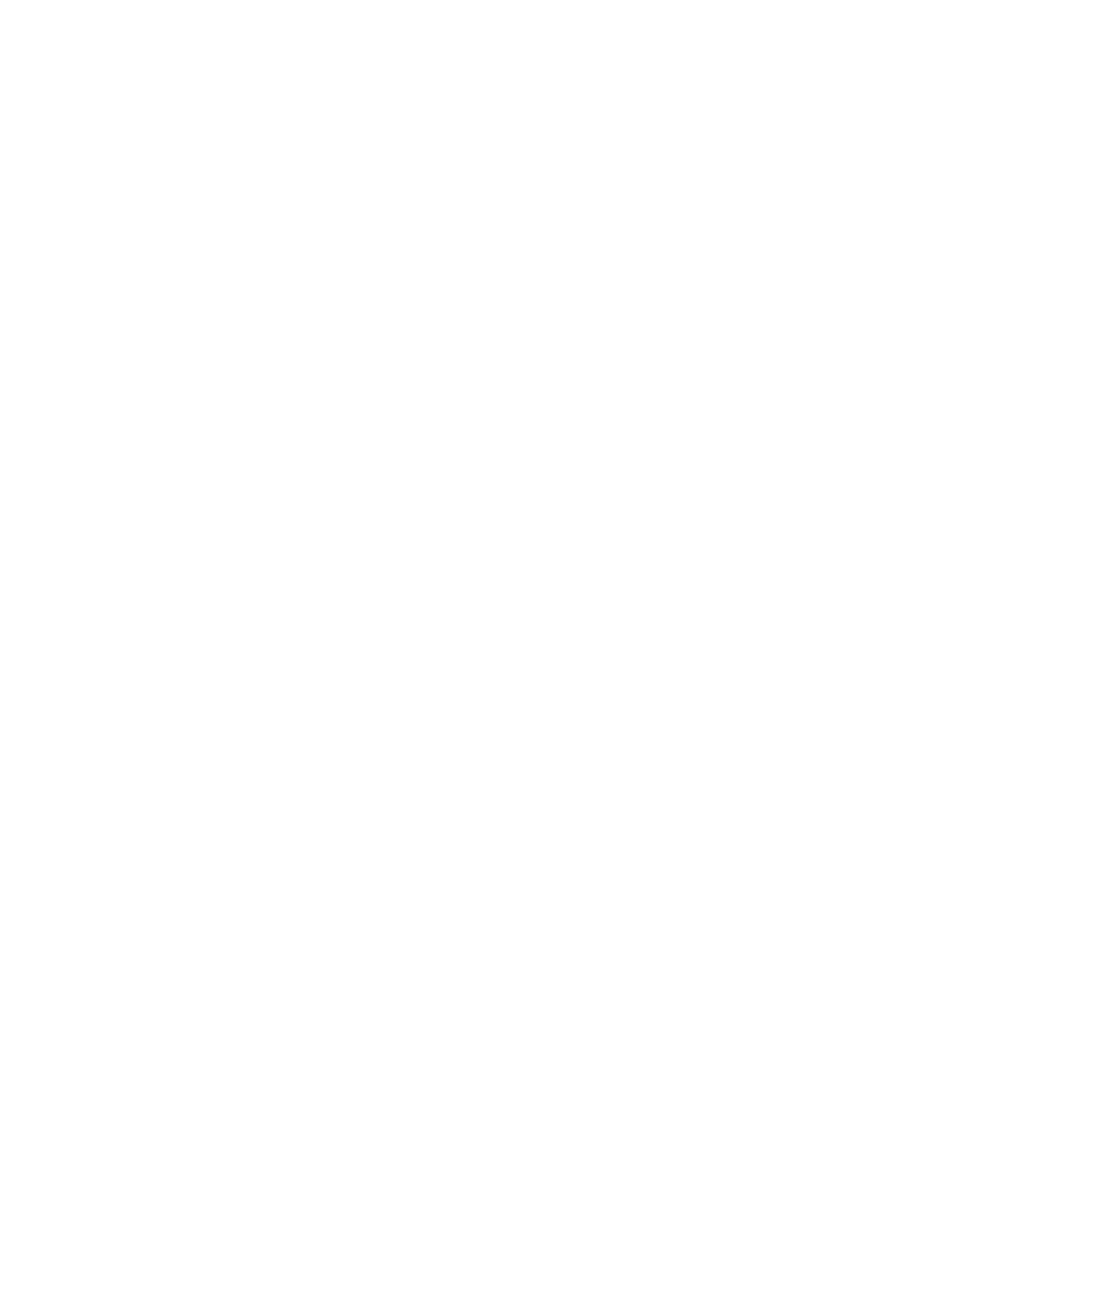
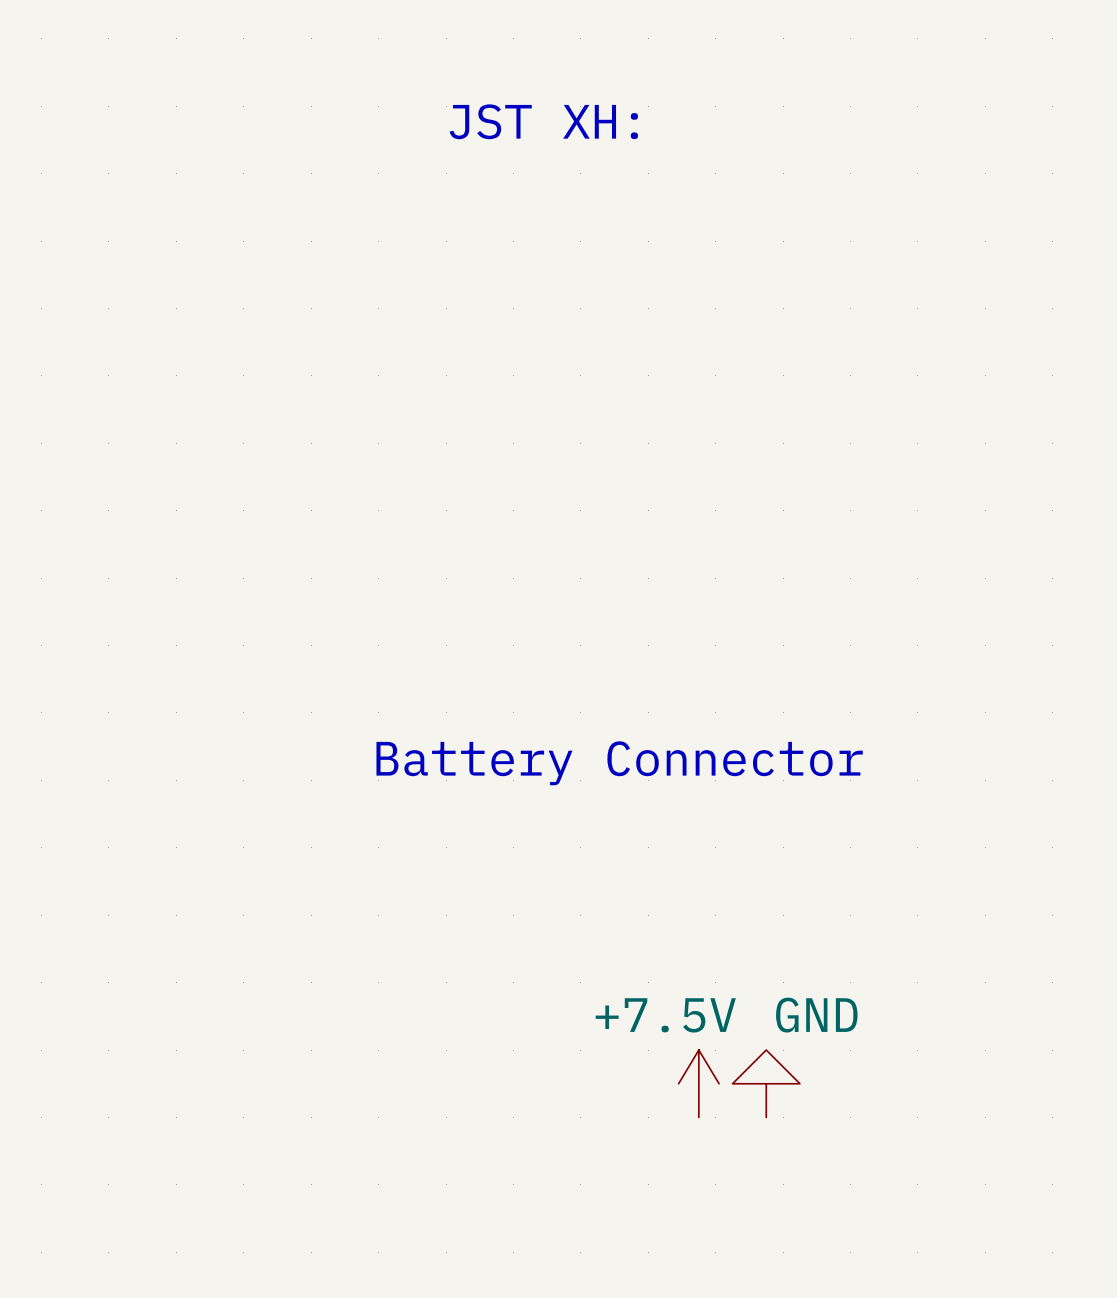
text: none -> JST XH: (543, 121)
text: none -> Battery Connector (619, 763)
power symbol: none -> +7.5V (698, 1083)
power symbol: none -> GND (766, 1083)

